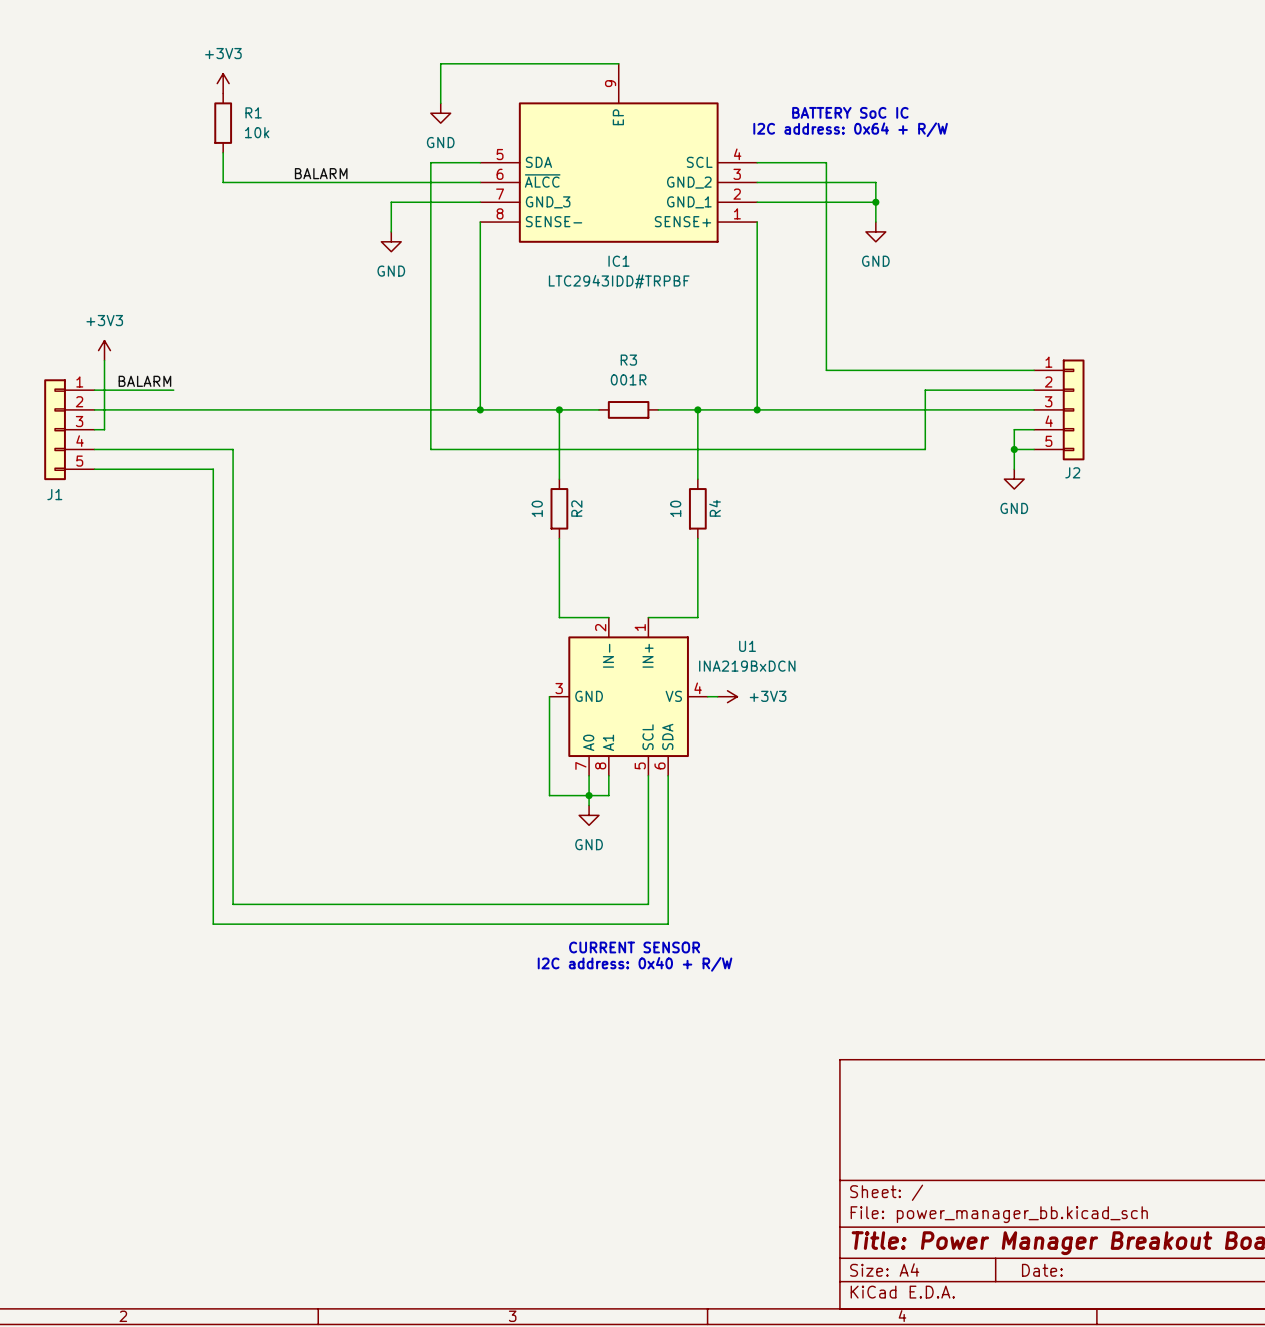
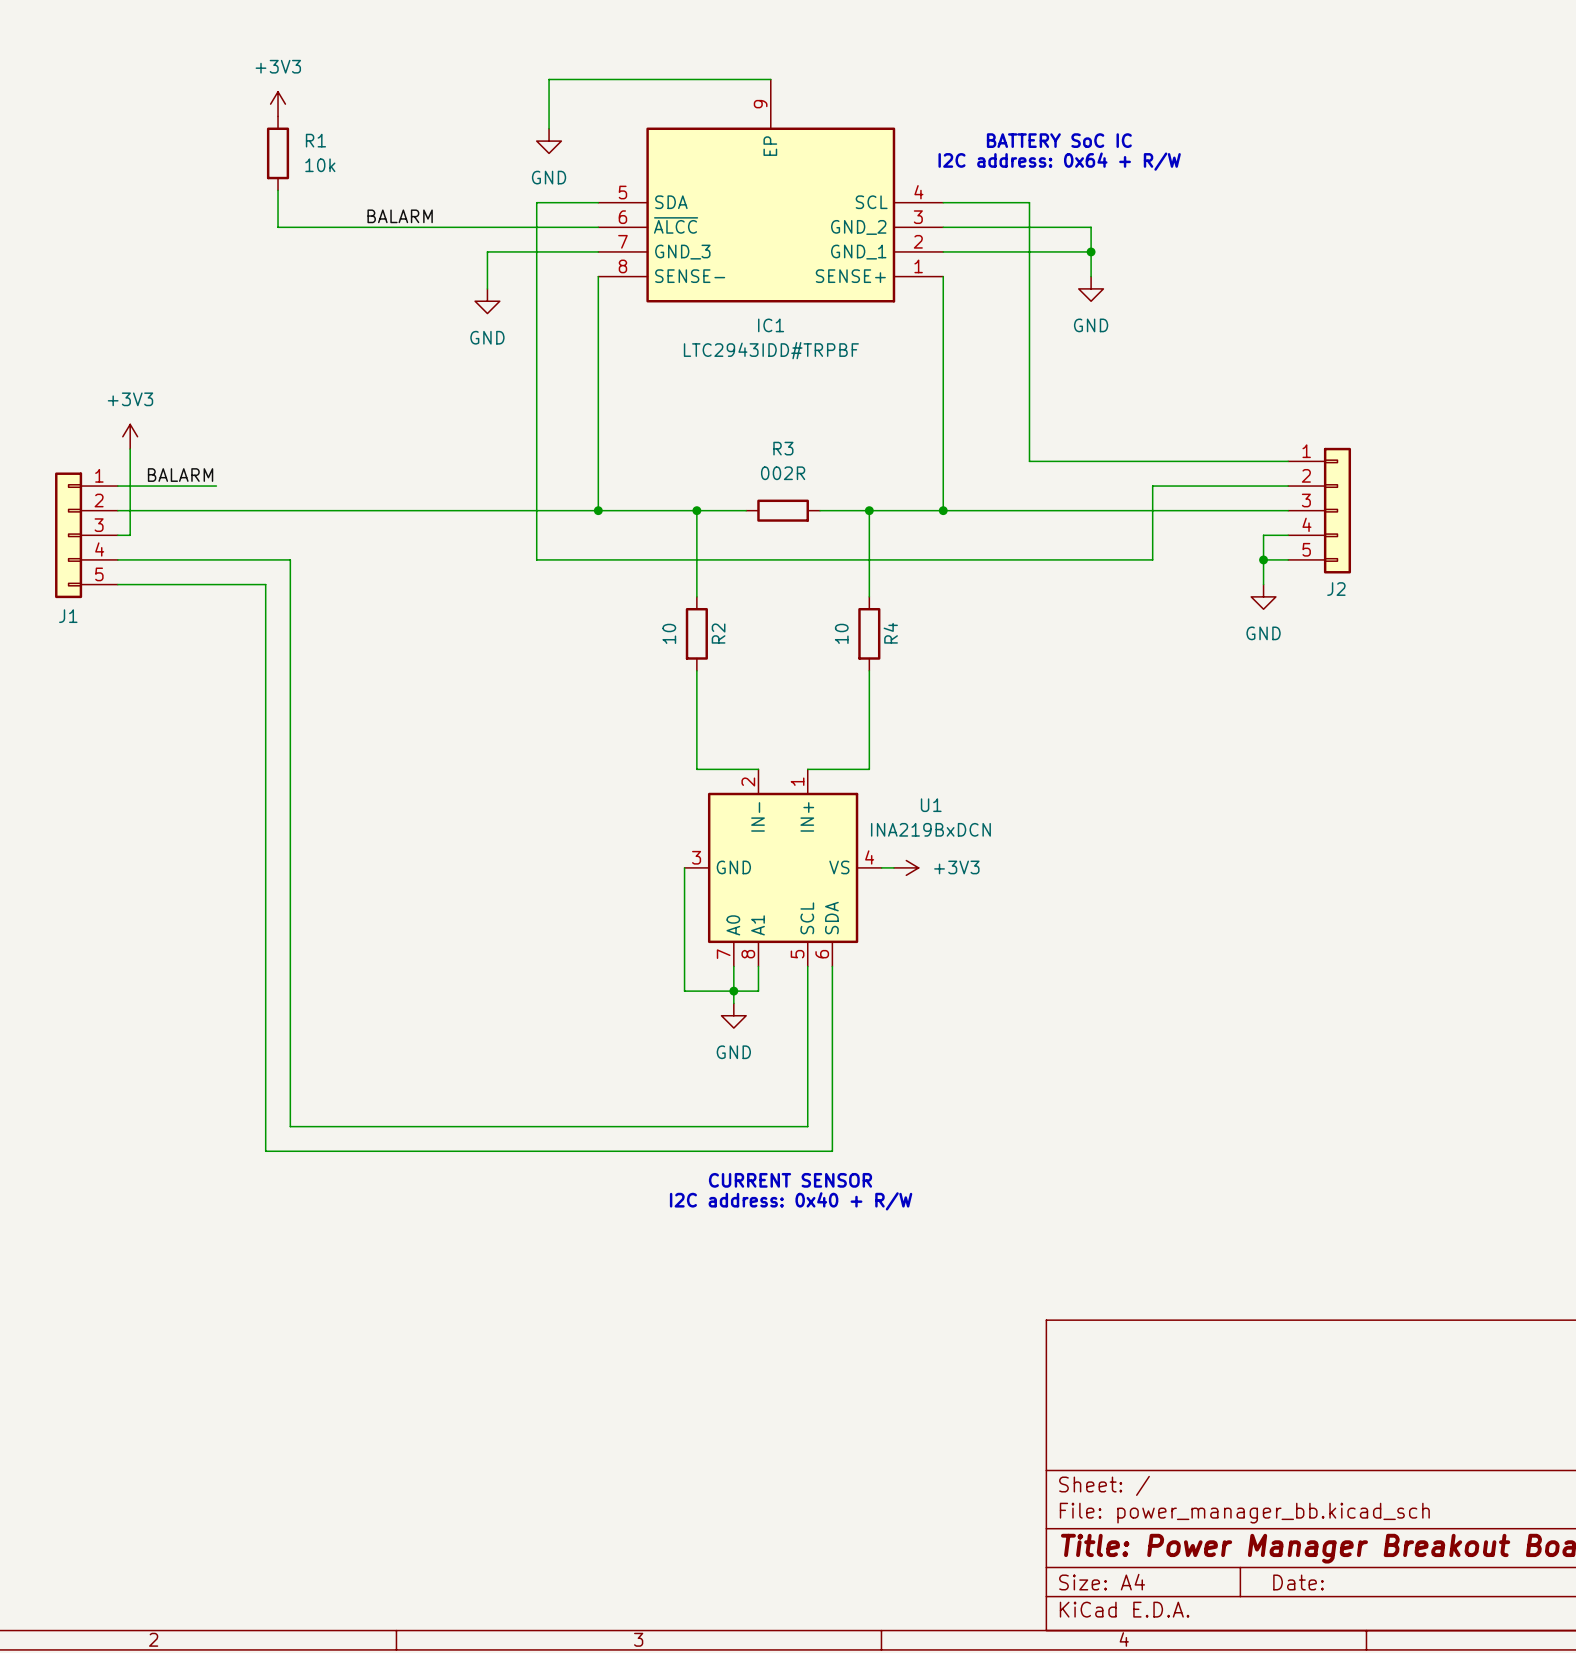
R3 value: 001R (628, 379) -> 002R (783, 473)

